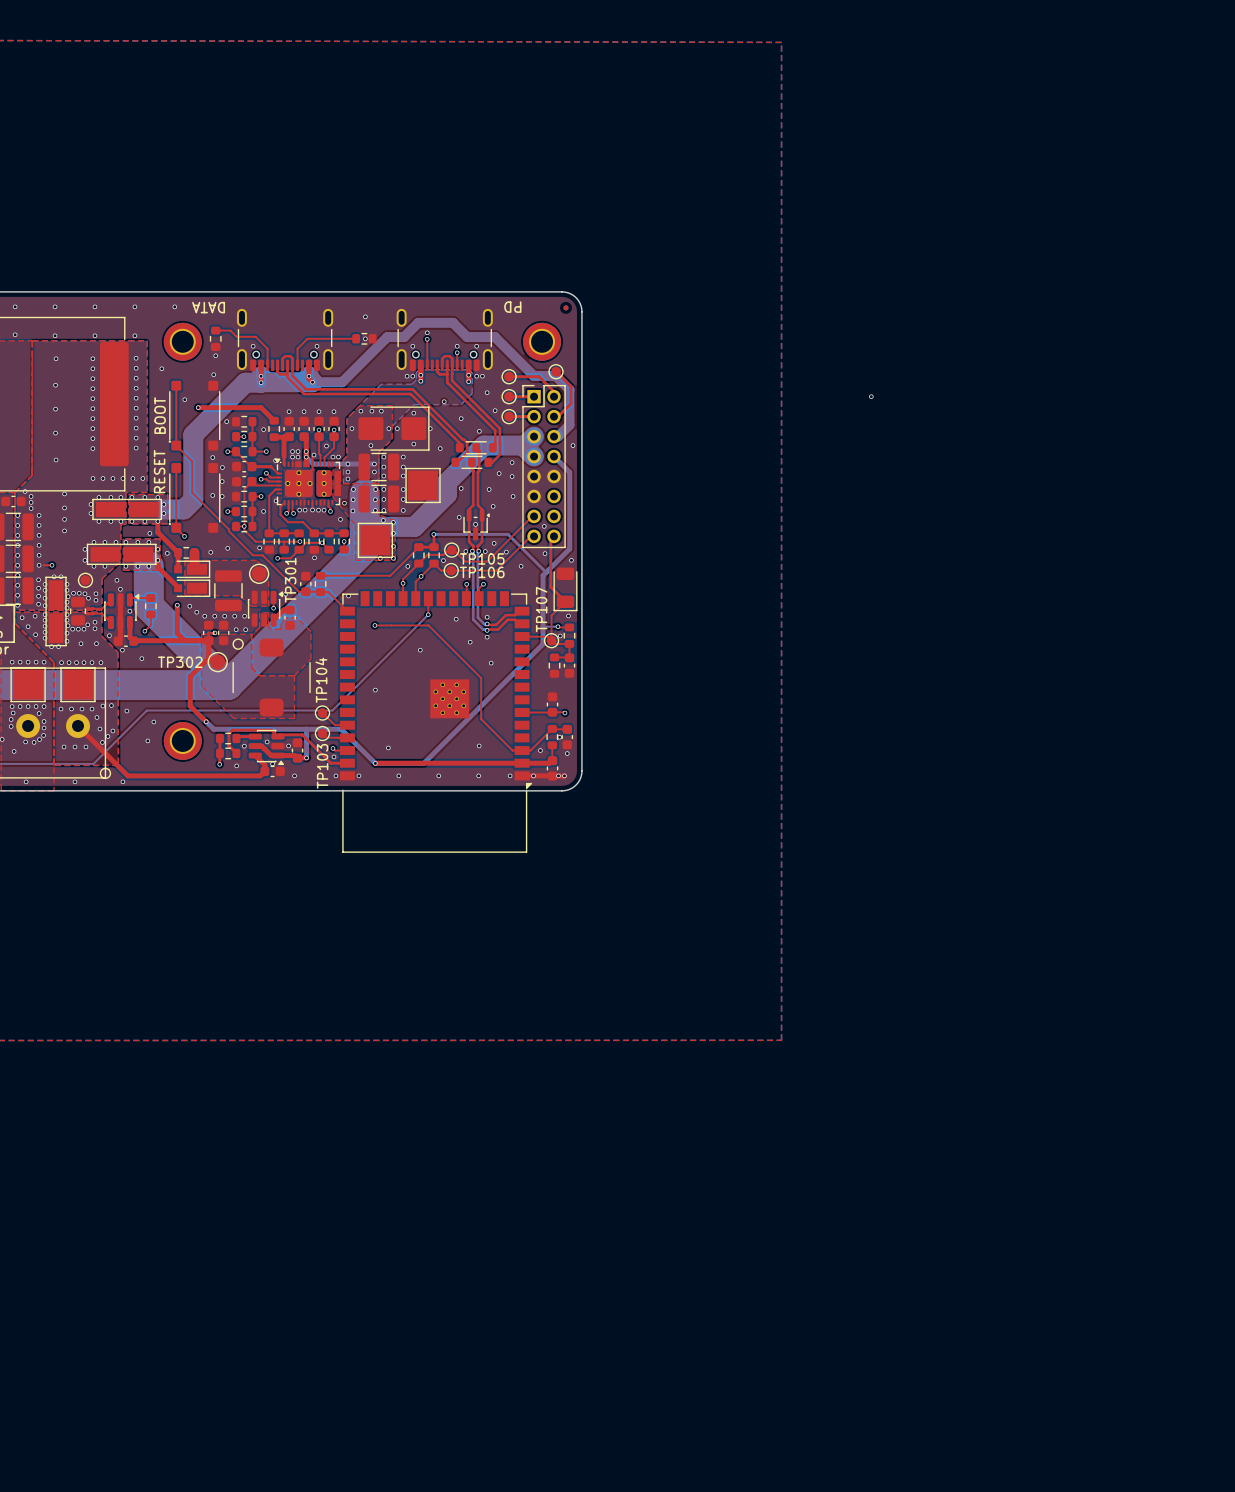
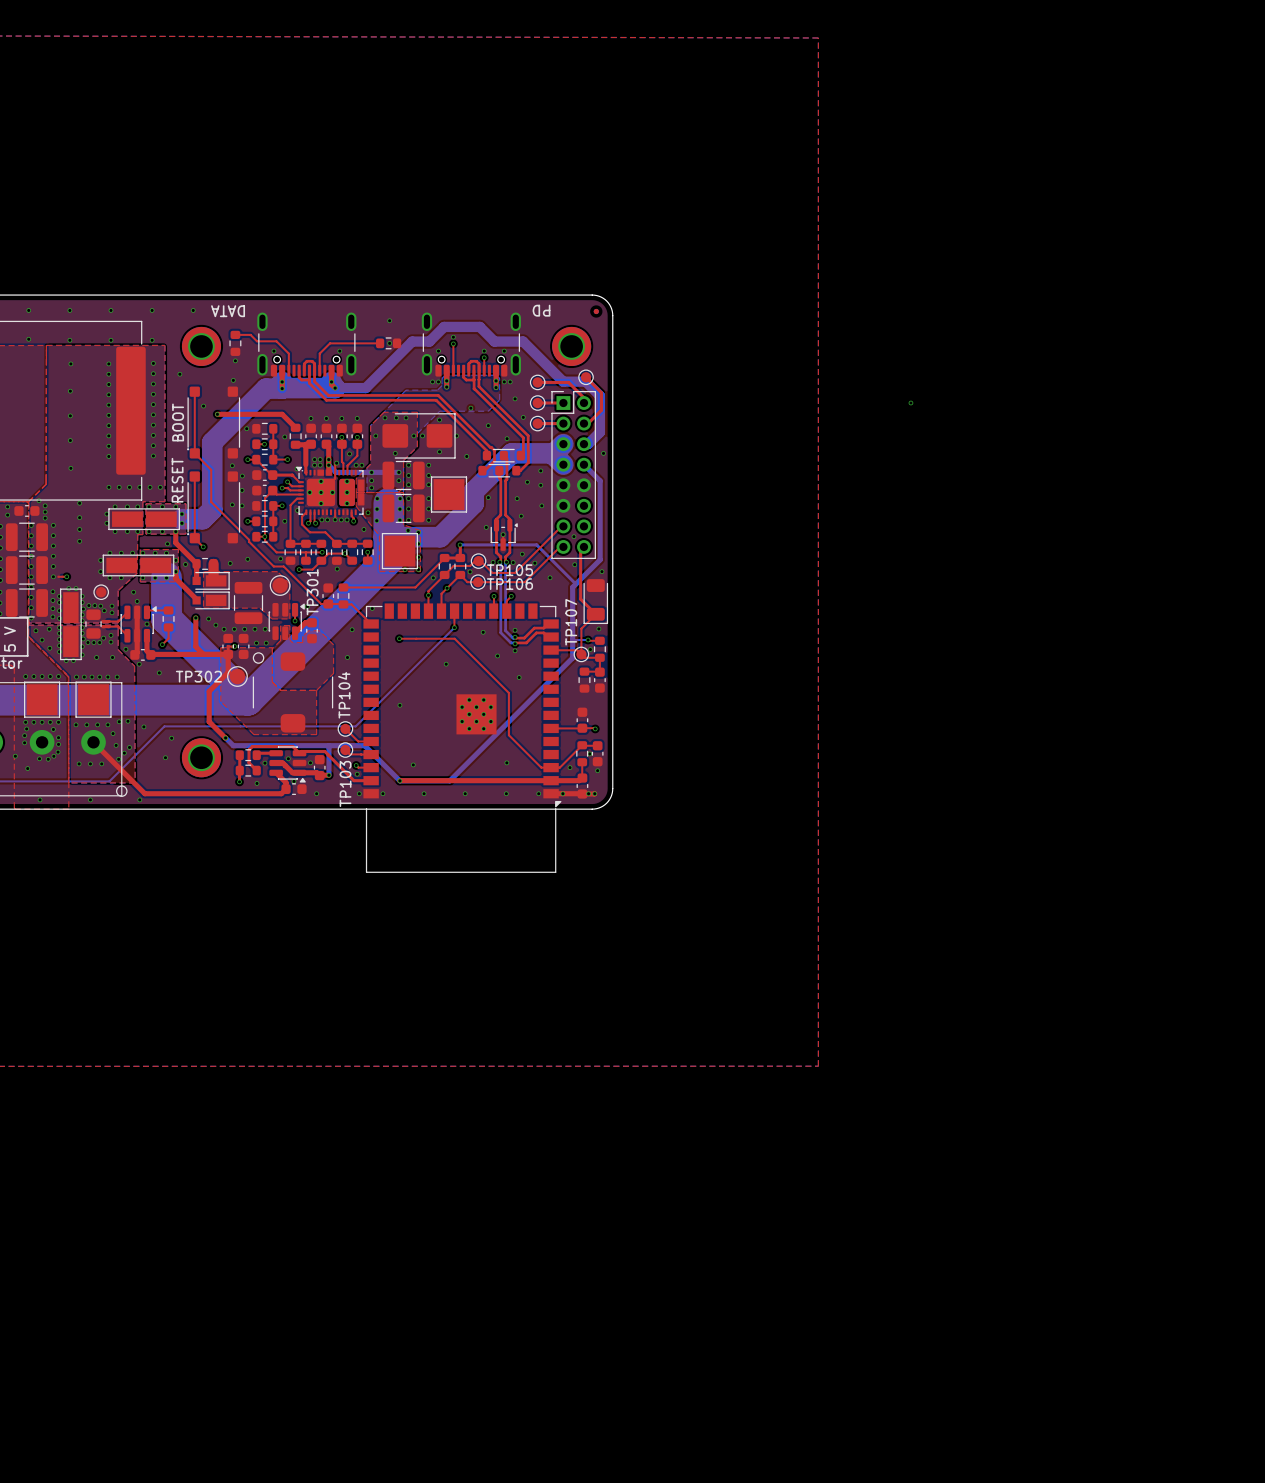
via: none -> (352, 629)
via: none -> (347, 657)

